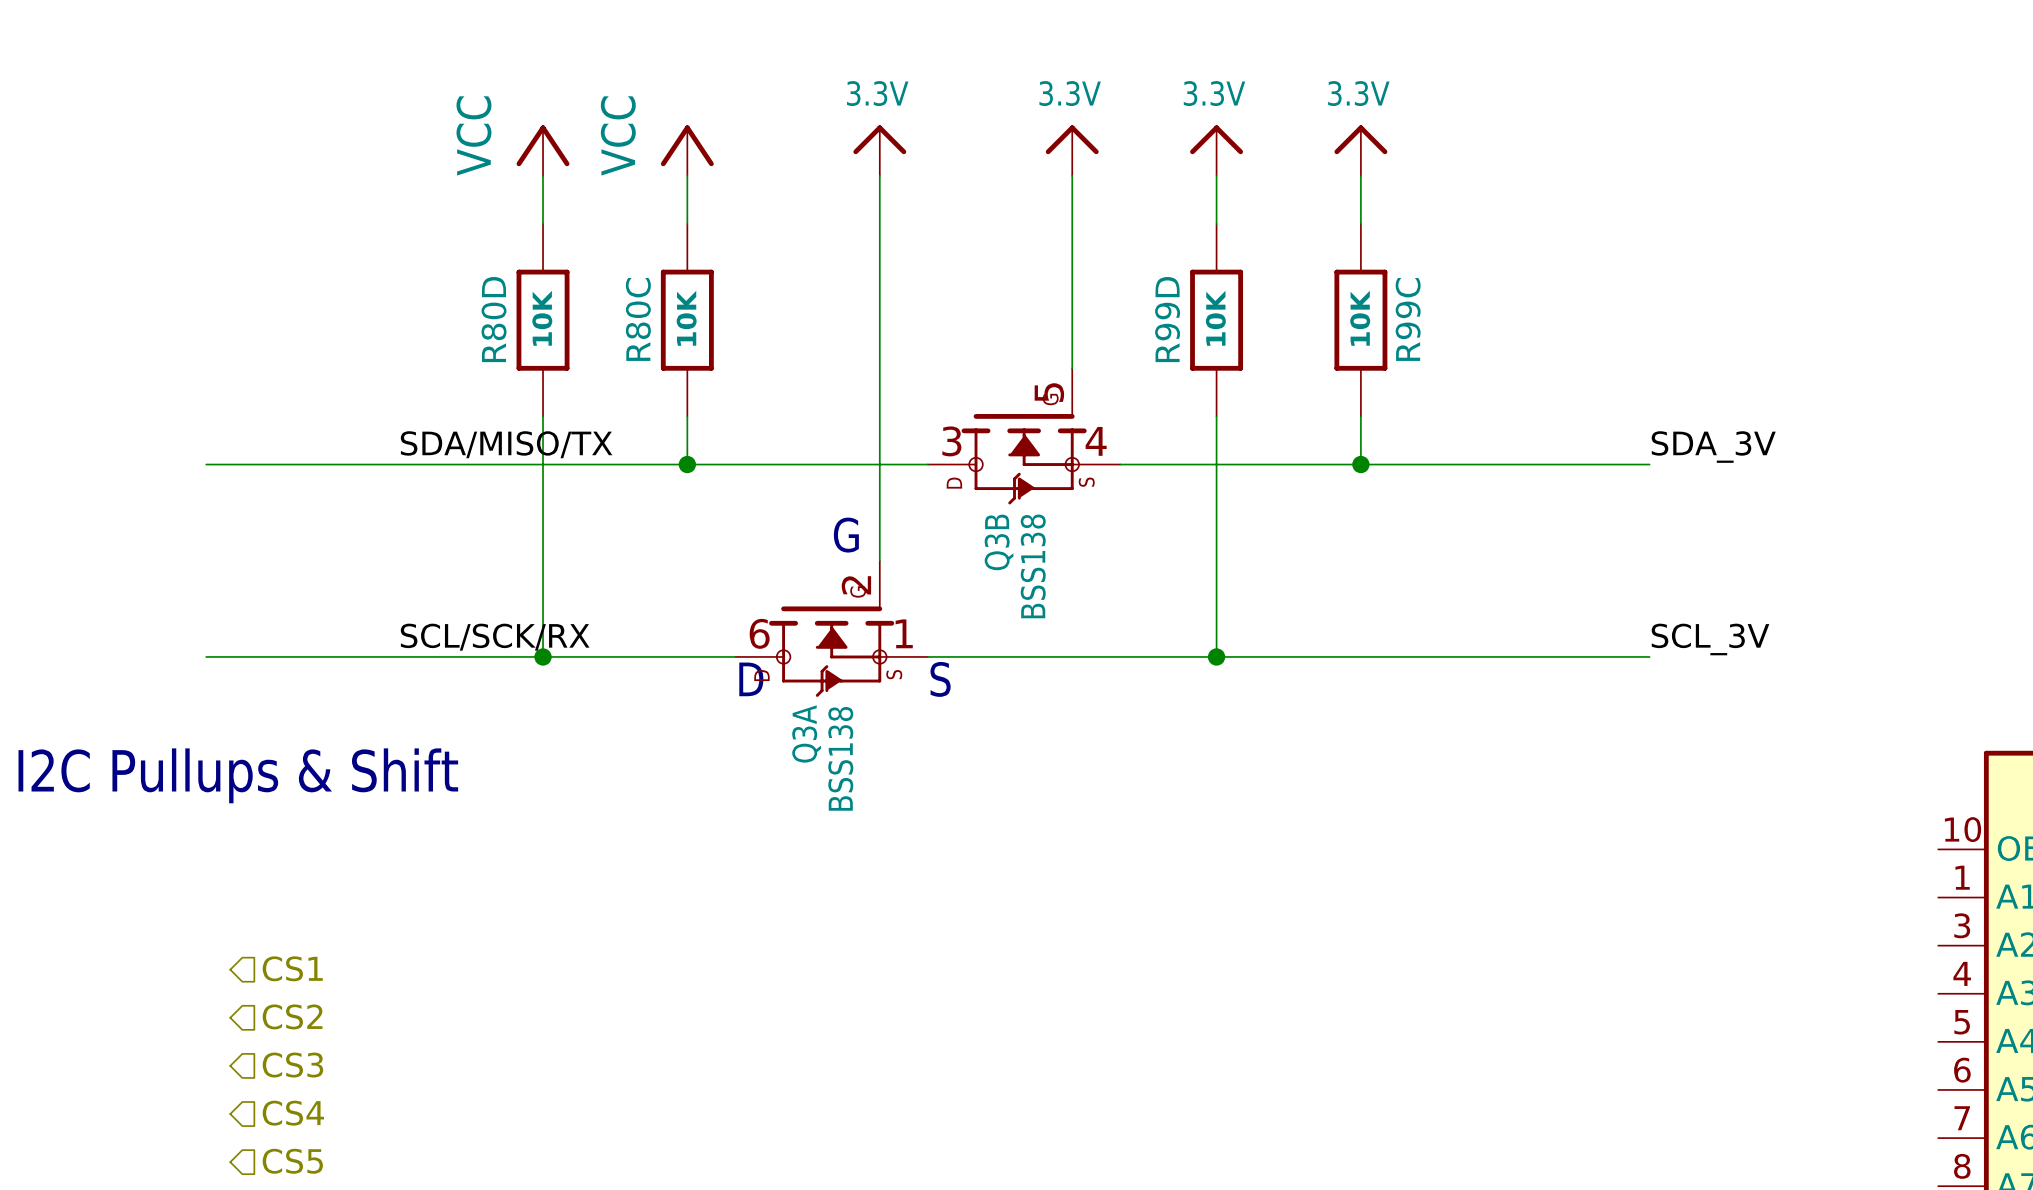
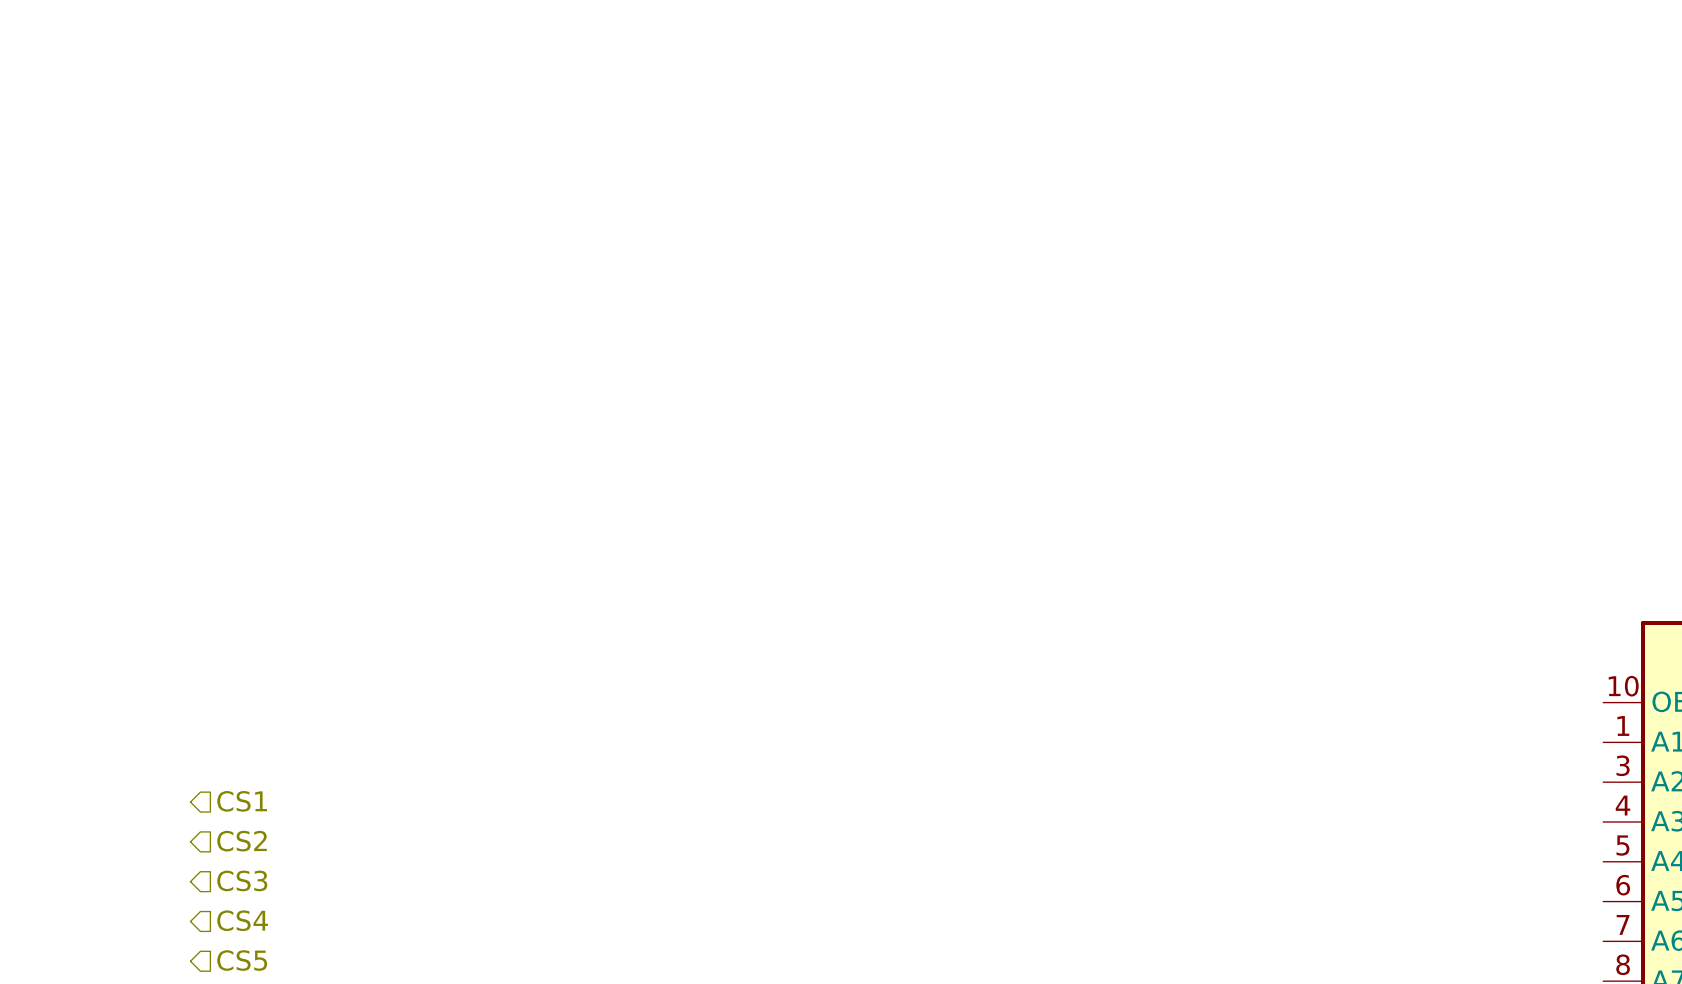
power symbol: VCC (543, 150) -> none
power symbol: VCC (687, 150) -> none
power symbol: 3.3V (879, 150) -> none
power symbol: 3.3V (1072, 150) -> none
power symbol: 3.3V (1216, 150) -> none
power symbol: 3.3V (1360, 150) -> none
wire: (543, 175) (543, 223) -> none
wire: (687, 175) (687, 223) -> none
wire: (879, 175) (879, 560) -> none
wire: (1072, 175) (1072, 368) -> none
wire: (1216, 175) (1216, 223) -> none
wire: (1360, 175) (1360, 223) -> none
R80D: 10K (543, 320) -> none
R80C: 10K (687, 320) -> none
R99D: 10K (1216, 320) -> none
R99C: 10K (1360, 320) -> none
wire: (543, 416) (543, 656) -> none
wire: (687, 416) (687, 464) -> none
wire: (1216, 416) (1216, 656) -> none
wire: (1360, 416) (1360, 464) -> none
Q3B: BSS138 (1024, 436) -> none
label: SDA/MISO/TX (506, 444) -> none
label: SDA_3V (1713, 447) -> none
wire: (206, 464) (927, 464) -> none
junction: (687, 464) -> none
wire: (1120, 464) (1649, 464) -> none
junction: (1360, 464) -> none
text: G (846, 535) -> none
Q3A: BSS138 (831, 628) -> none
label: SCL/SCK/RX (495, 637) -> none
label: SCL_3V (1710, 639) -> none
wire: (206, 656) (735, 656) -> none
junction: (543, 656) -> none
wire: (927, 656) (1649, 656) -> none
junction: (1216, 656) -> none
text: D (751, 679) -> none
text: S (940, 679) -> none
text: I2C Pullups & Shift (238, 775) -> none

